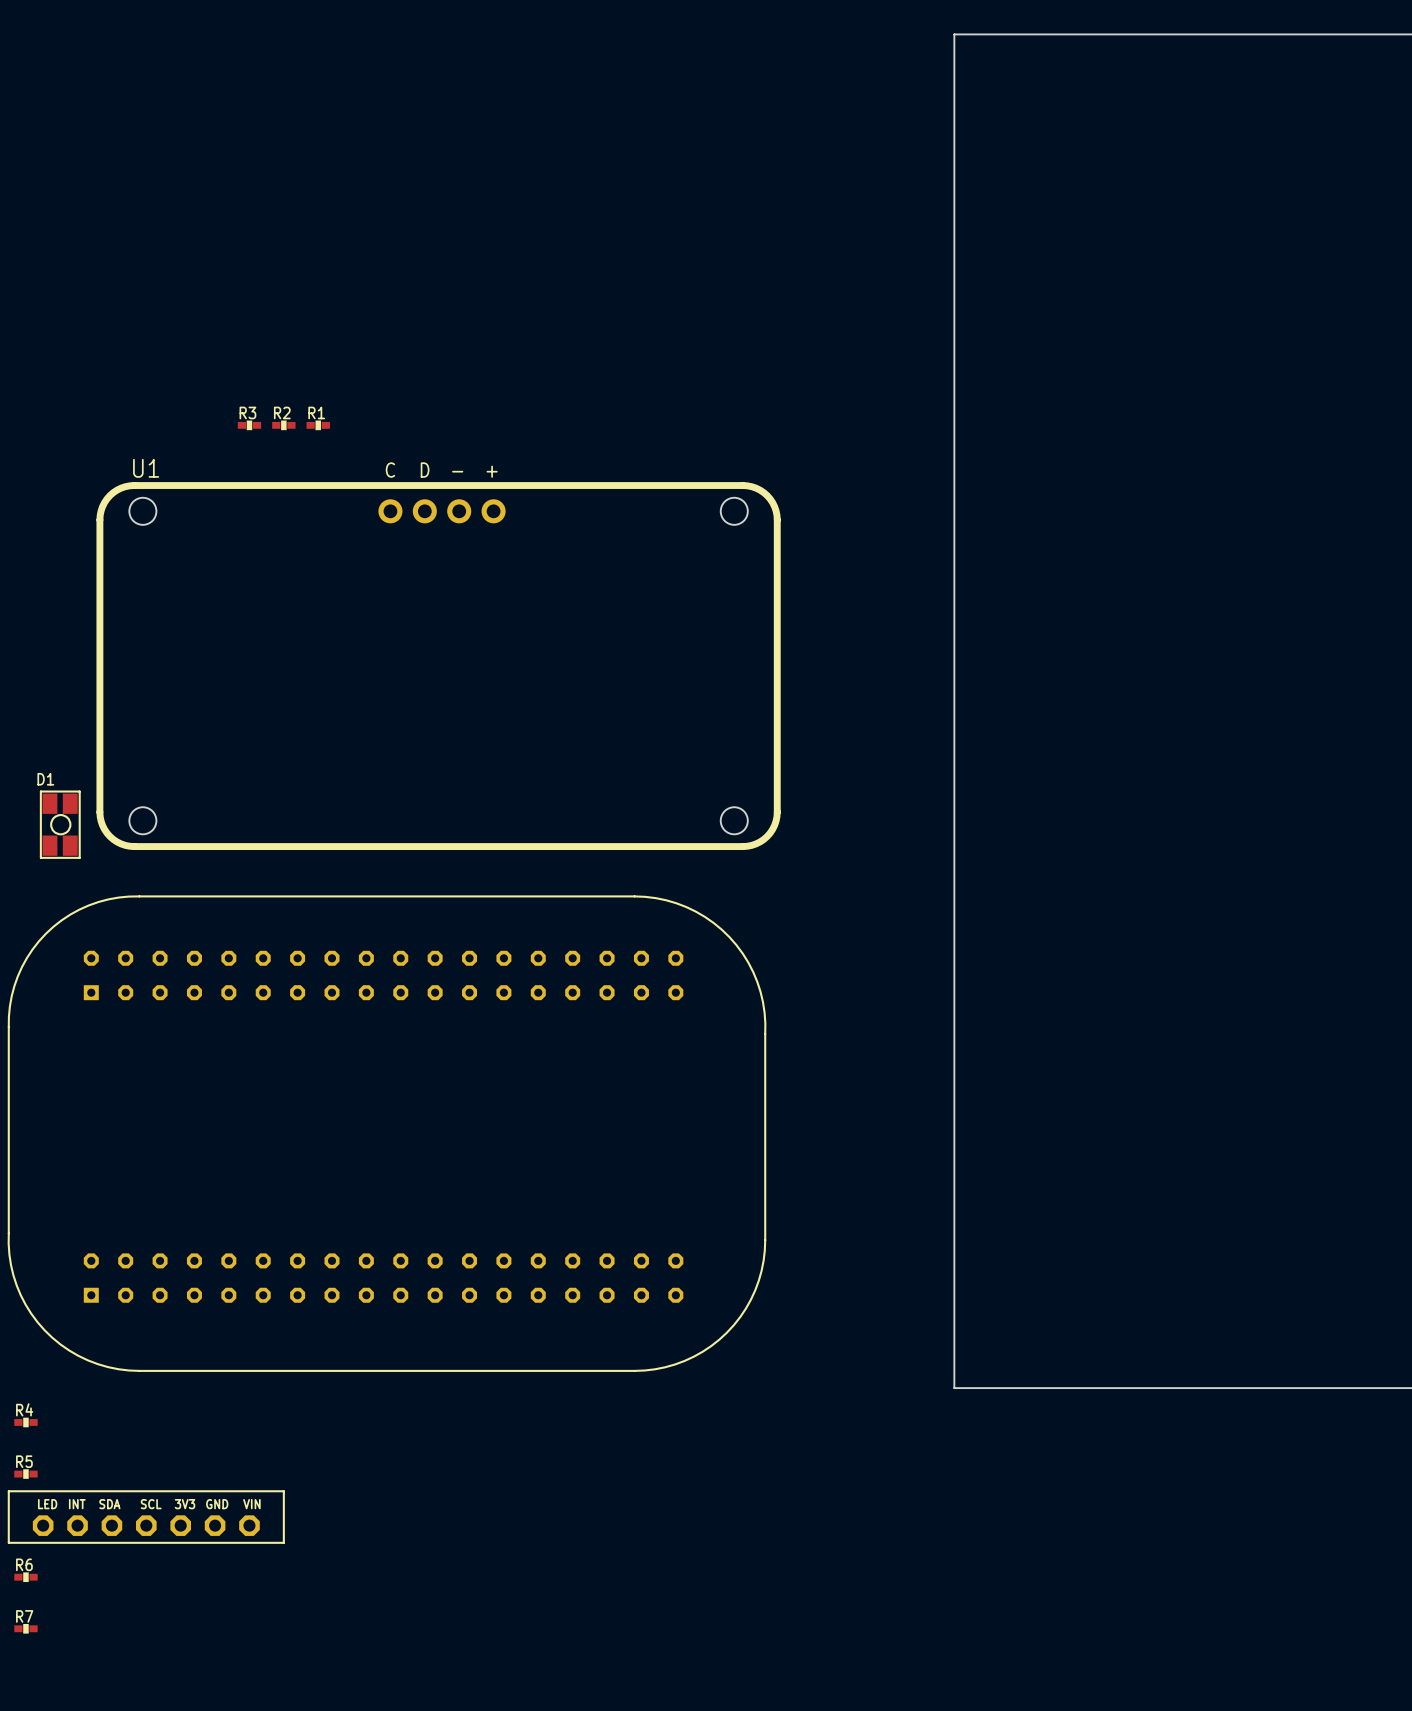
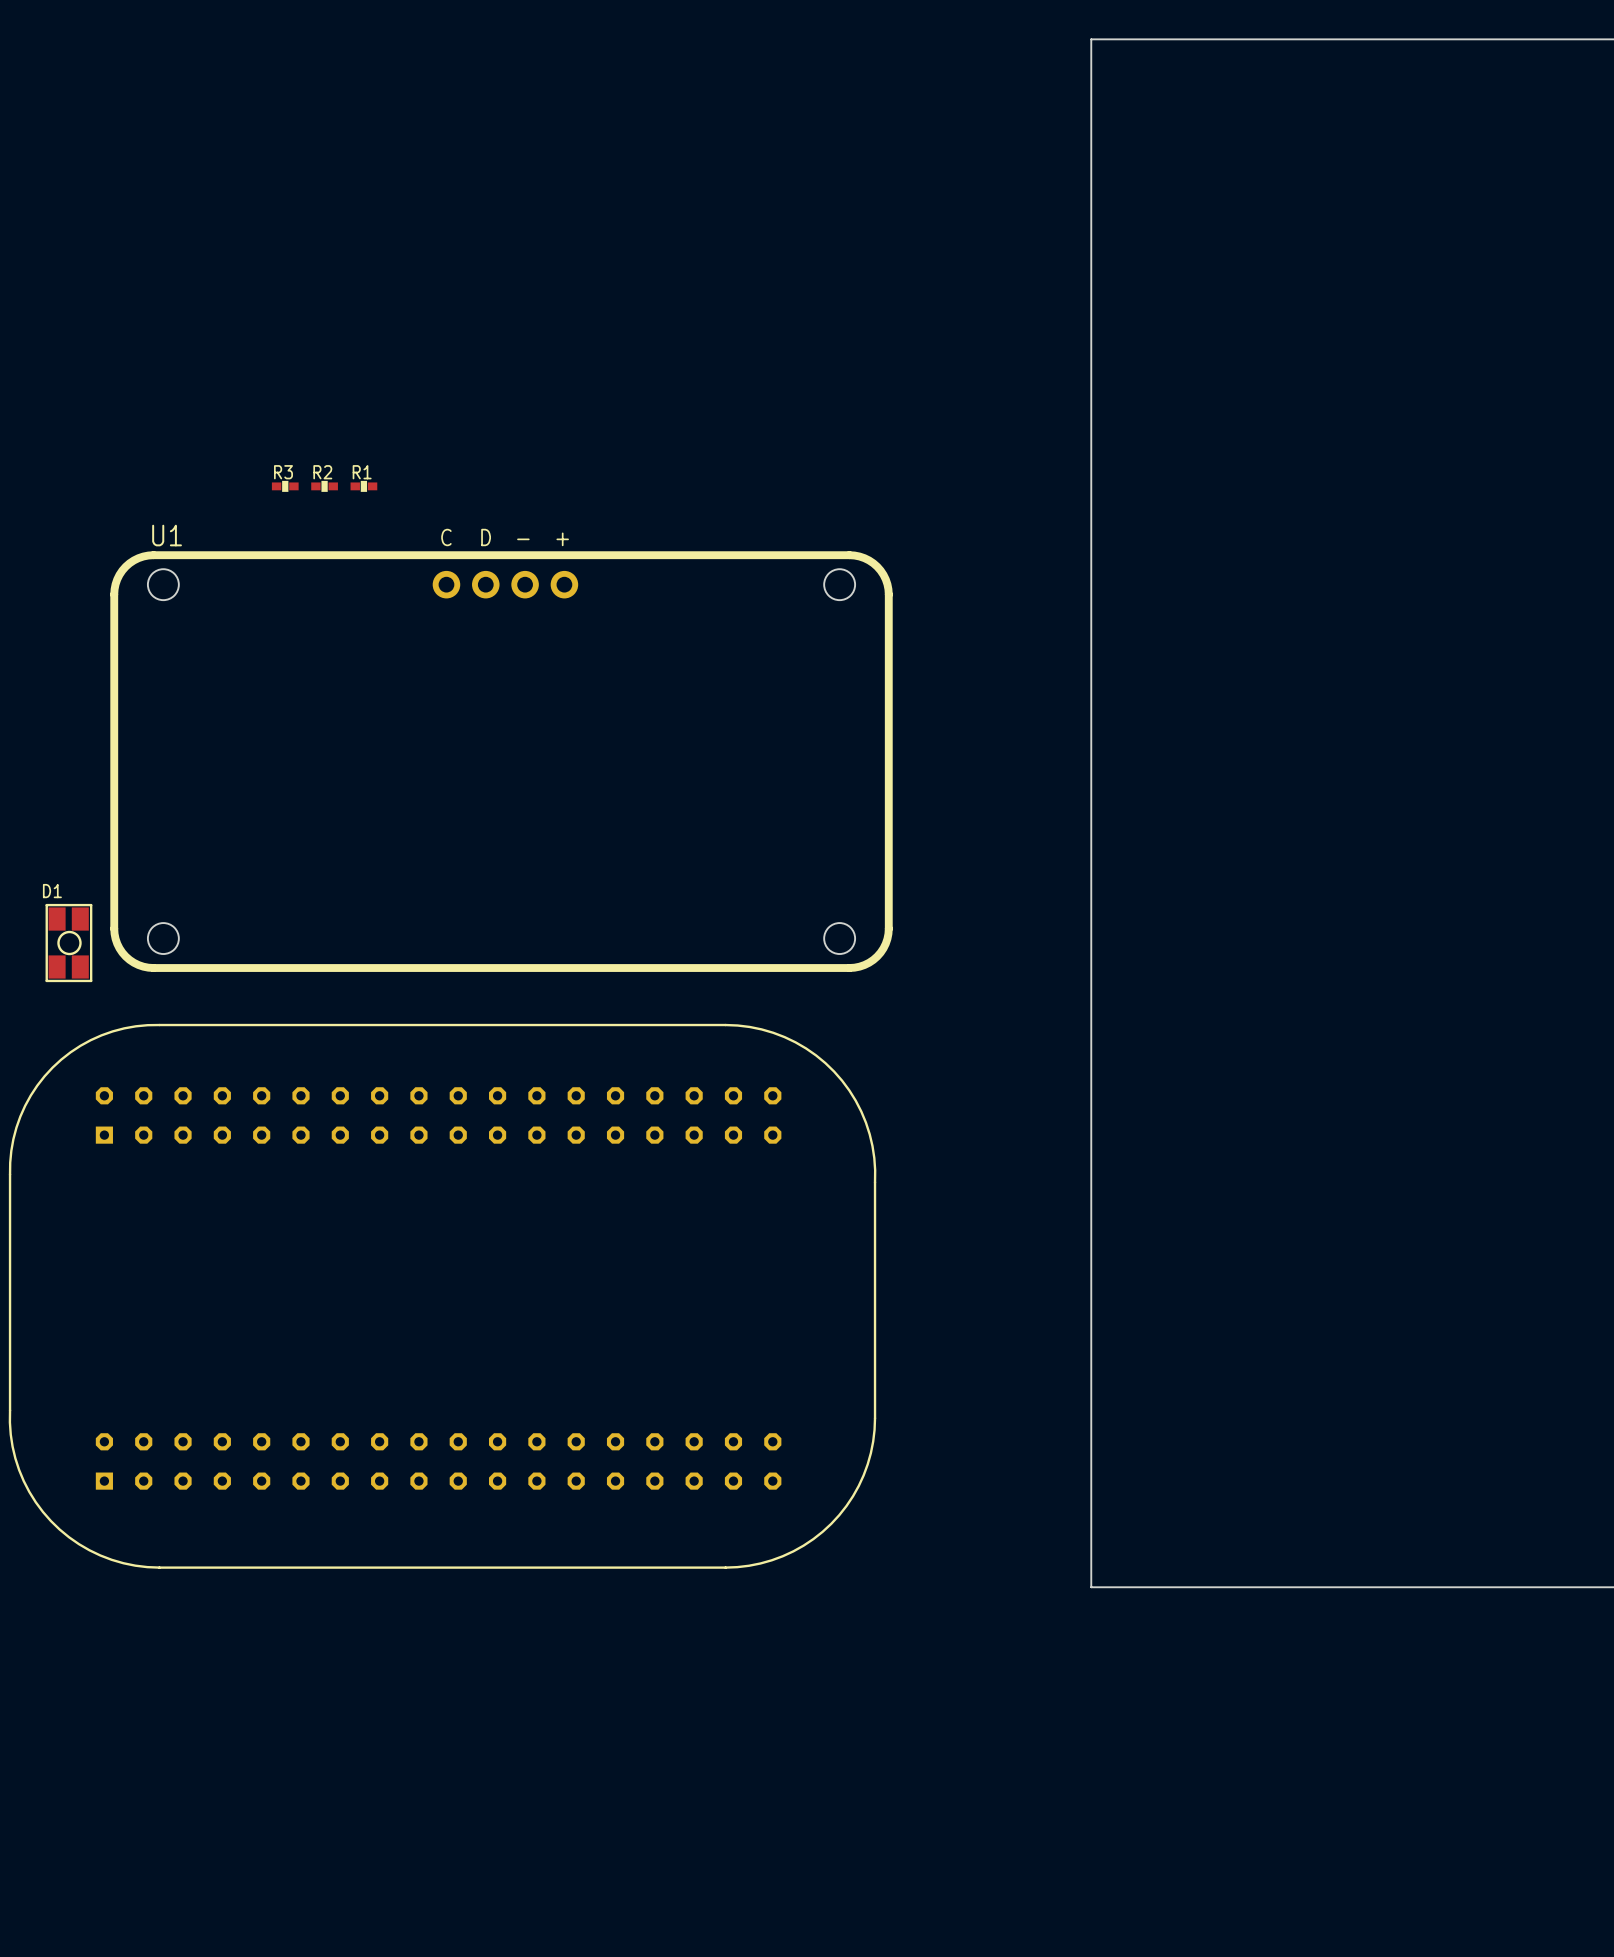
R4: (25, 1422) -> none
R5: (25, 1474) -> none
part: (146, 1517) -> none
R6: (25, 1577) -> none
R7: (25, 1628) -> none

